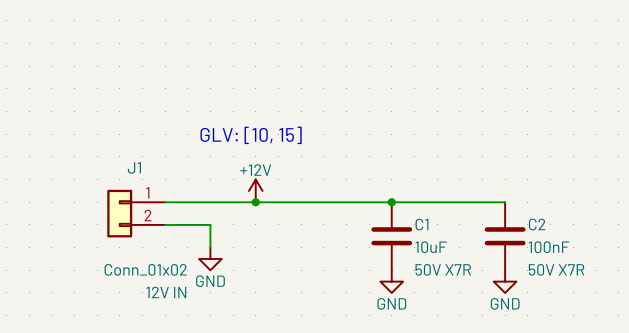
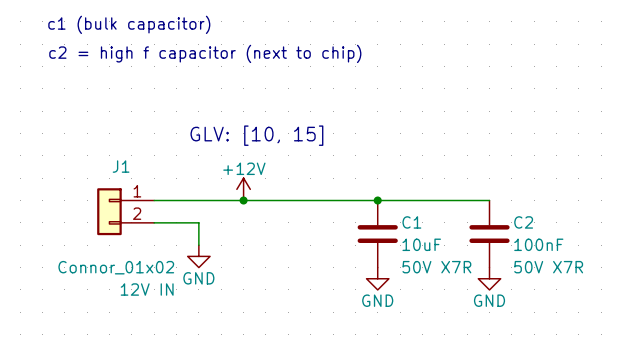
text: none -> c1 (bulk capacitor) (129, 24)
text: none -> c2 = high f capacitor (next to chip) (205, 53)
J1 value: Conn_01x02 (145, 269) -> Connor_01x02 (116, 267)

